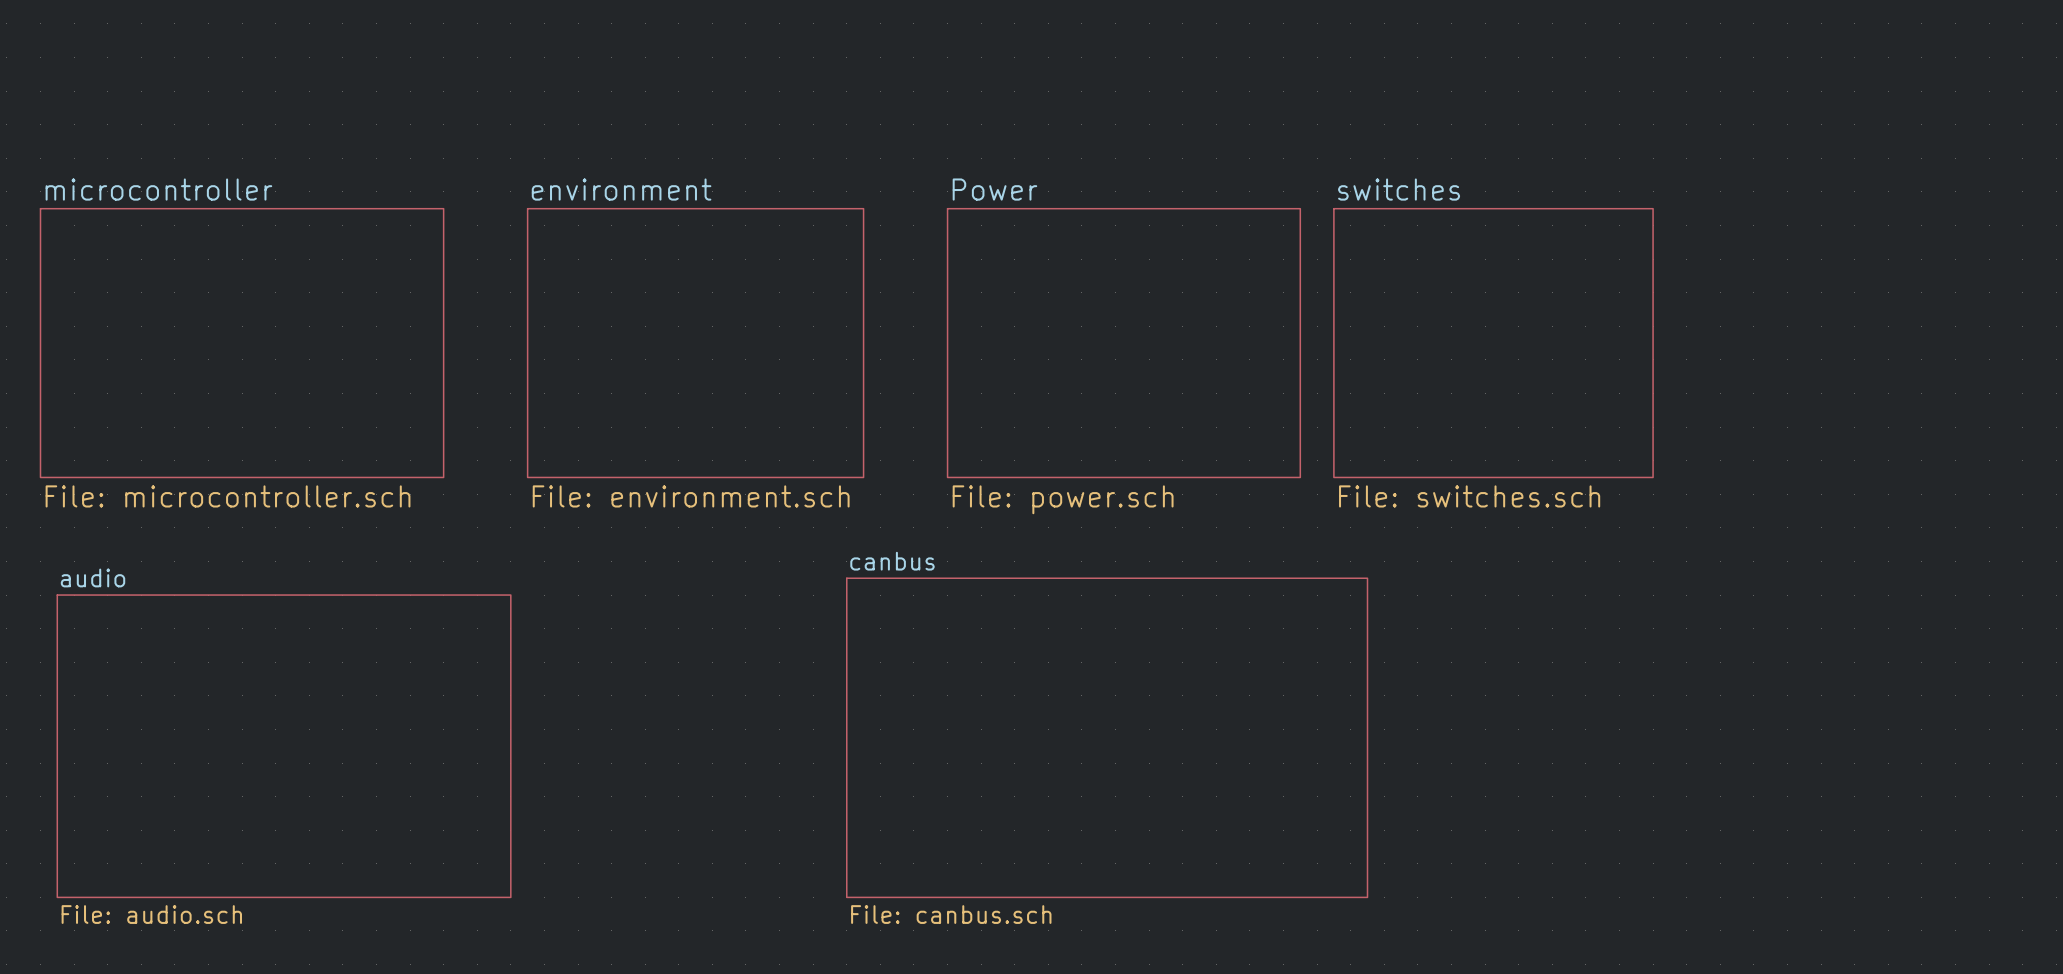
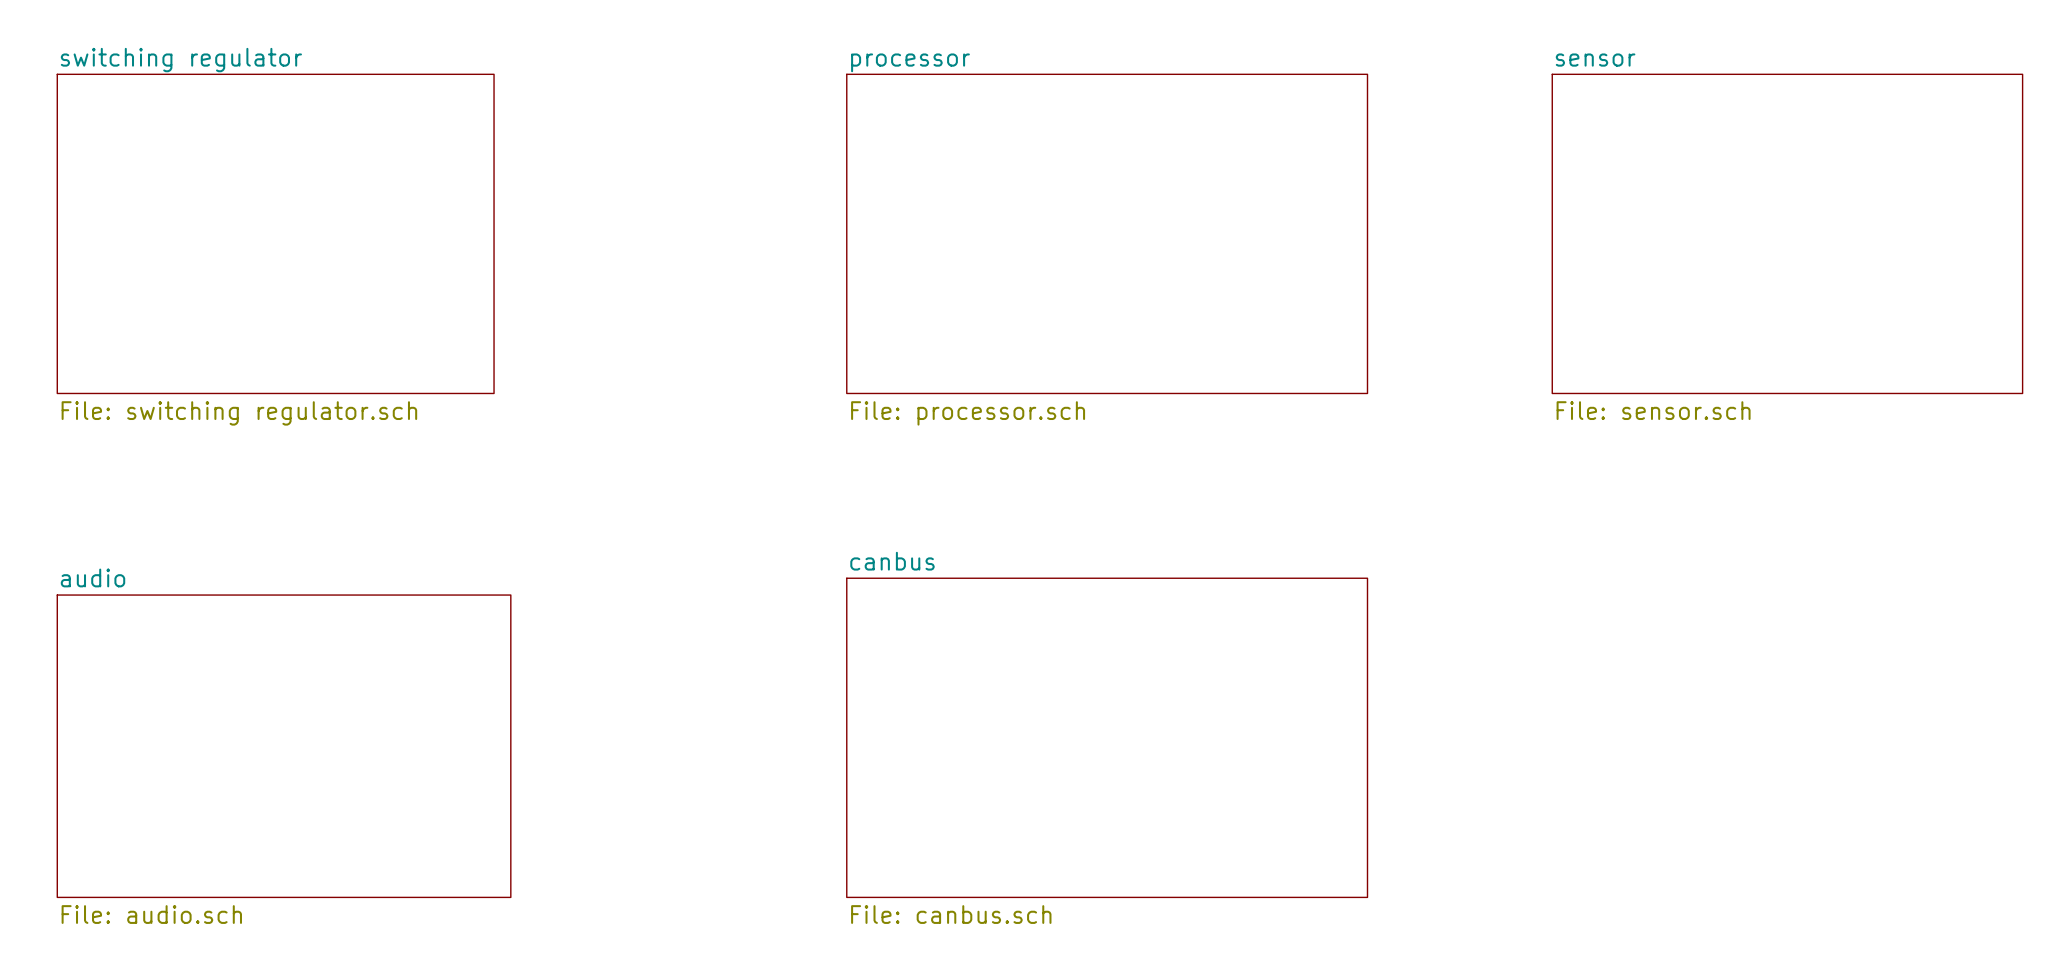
sheet switching regulator: none -> File: switching regulator.sch (275, 233)
sheet processor: none -> File: processor.sch (1107, 233)
sheet sensor: none -> File: sensor.sch (1787, 233)
sheet microcontroller: File: microcontroller.sch (242, 343) -> none
sheet environment: File: environment.sch (695, 343) -> none
sheet Power: File: power.sch (1123, 343) -> none
sheet switches: File: switches.sch (1493, 343) -> none

